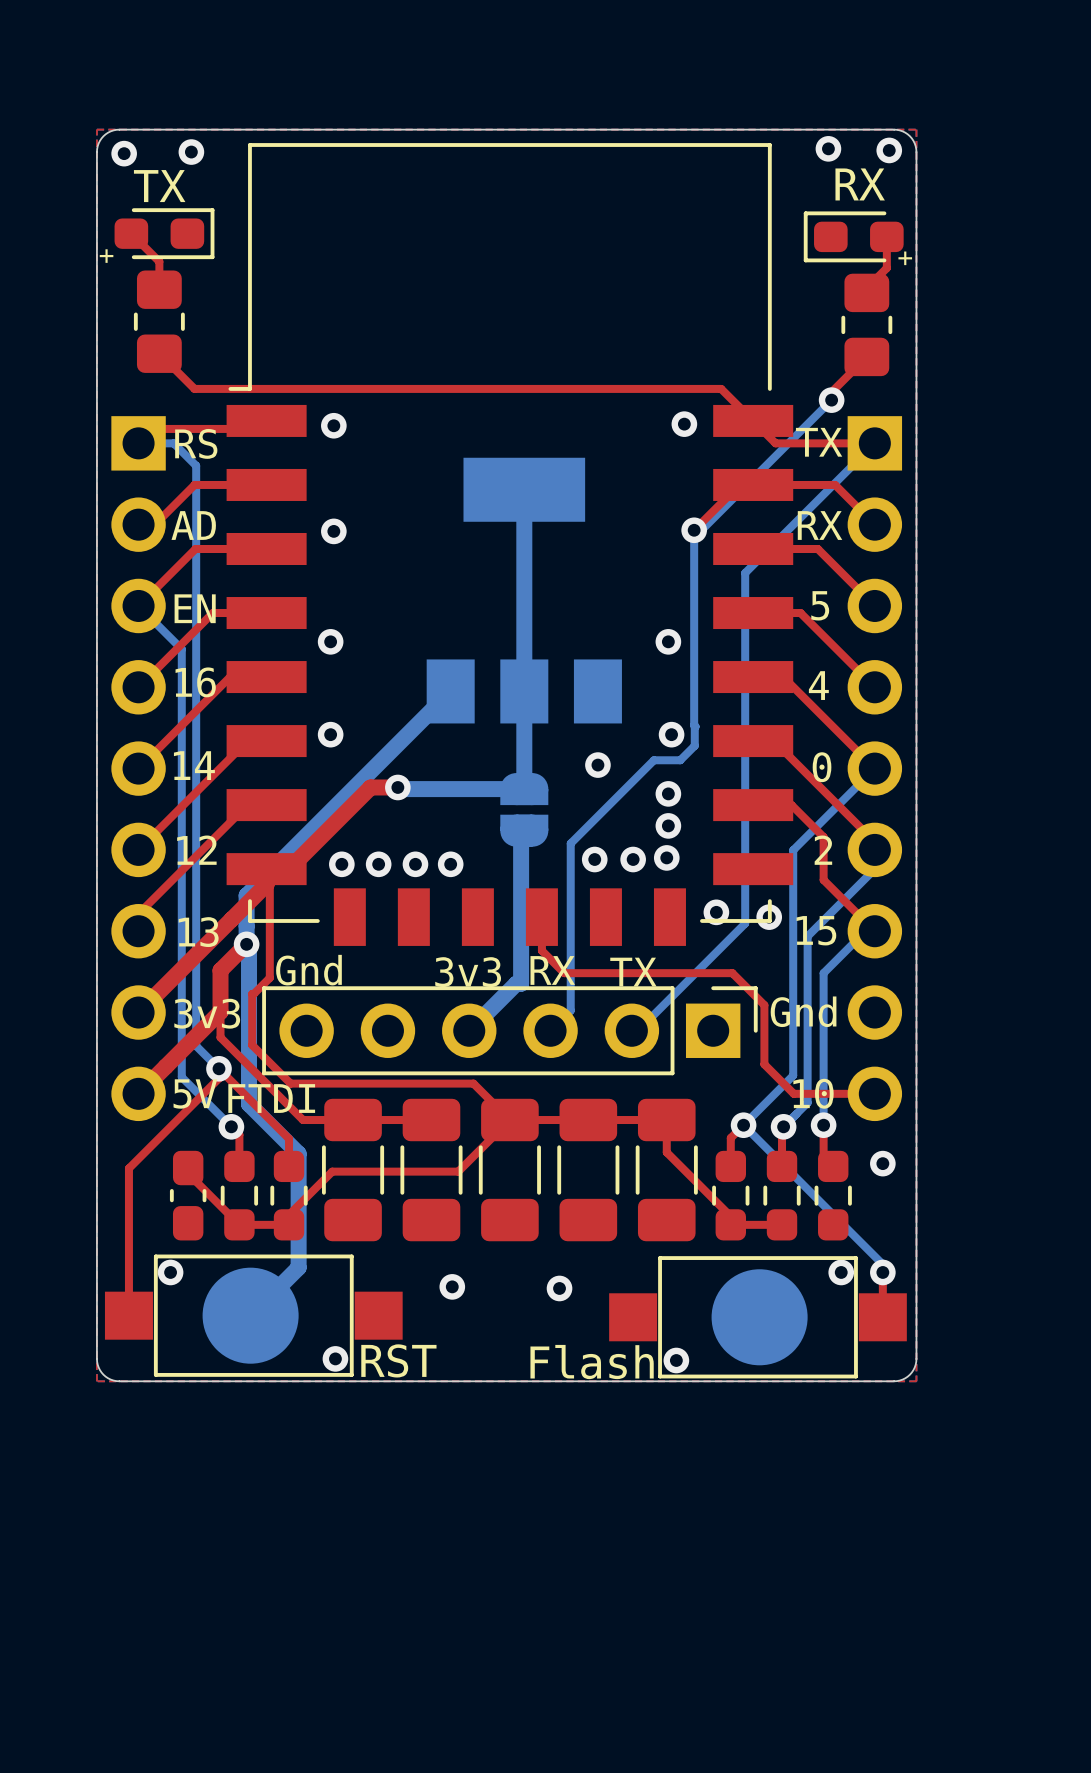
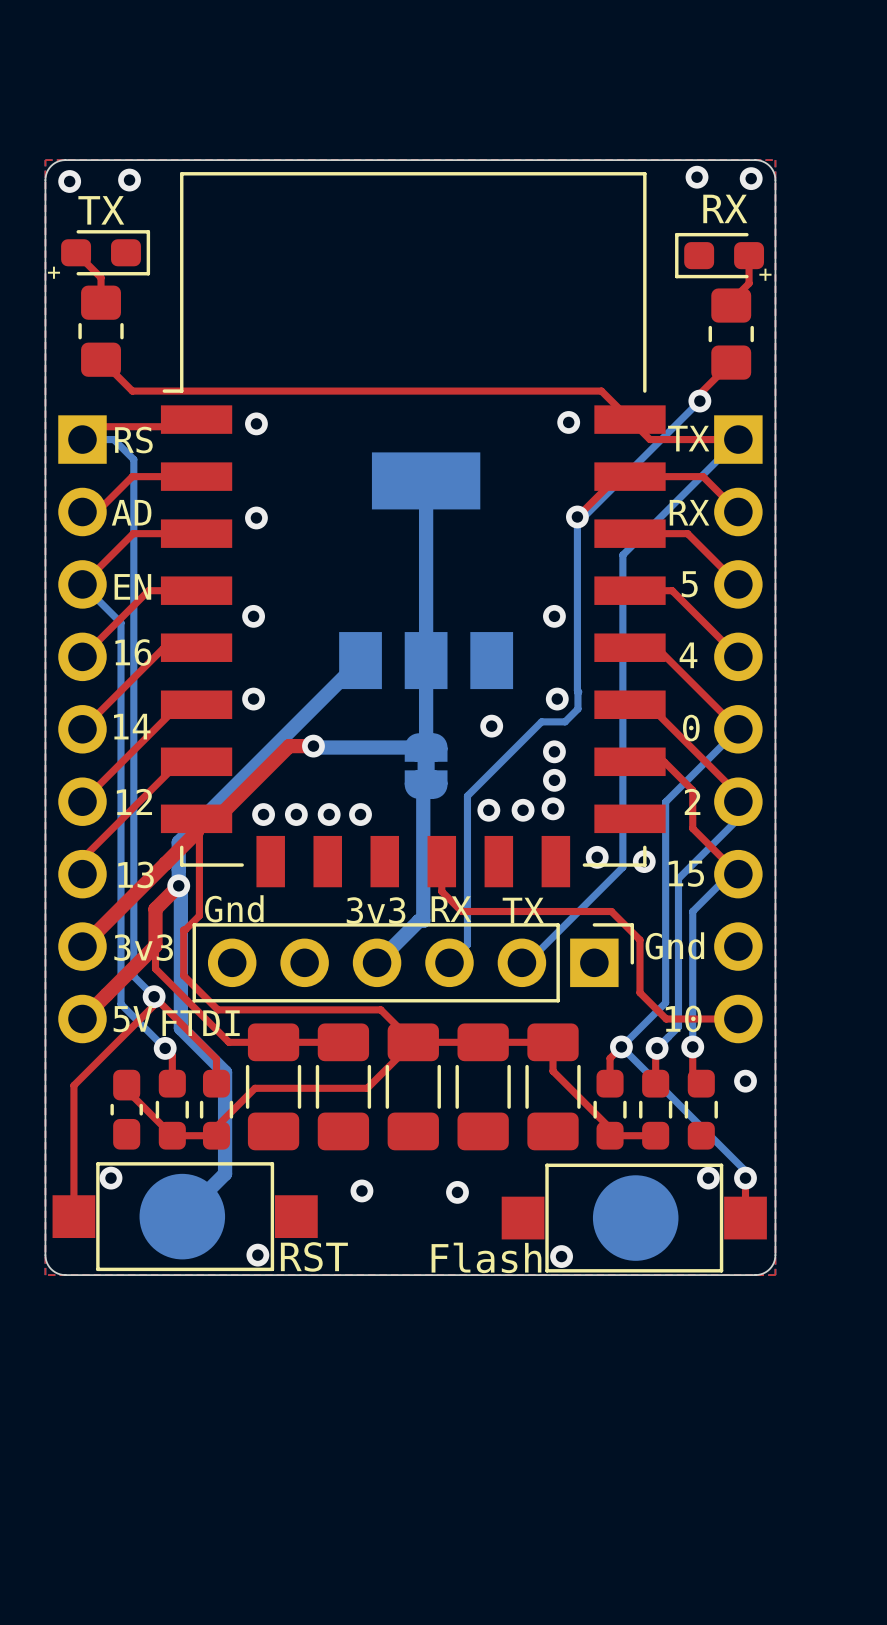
part footprint: [500, 773, 549, 847] -> [404, 733, 448, 799]

